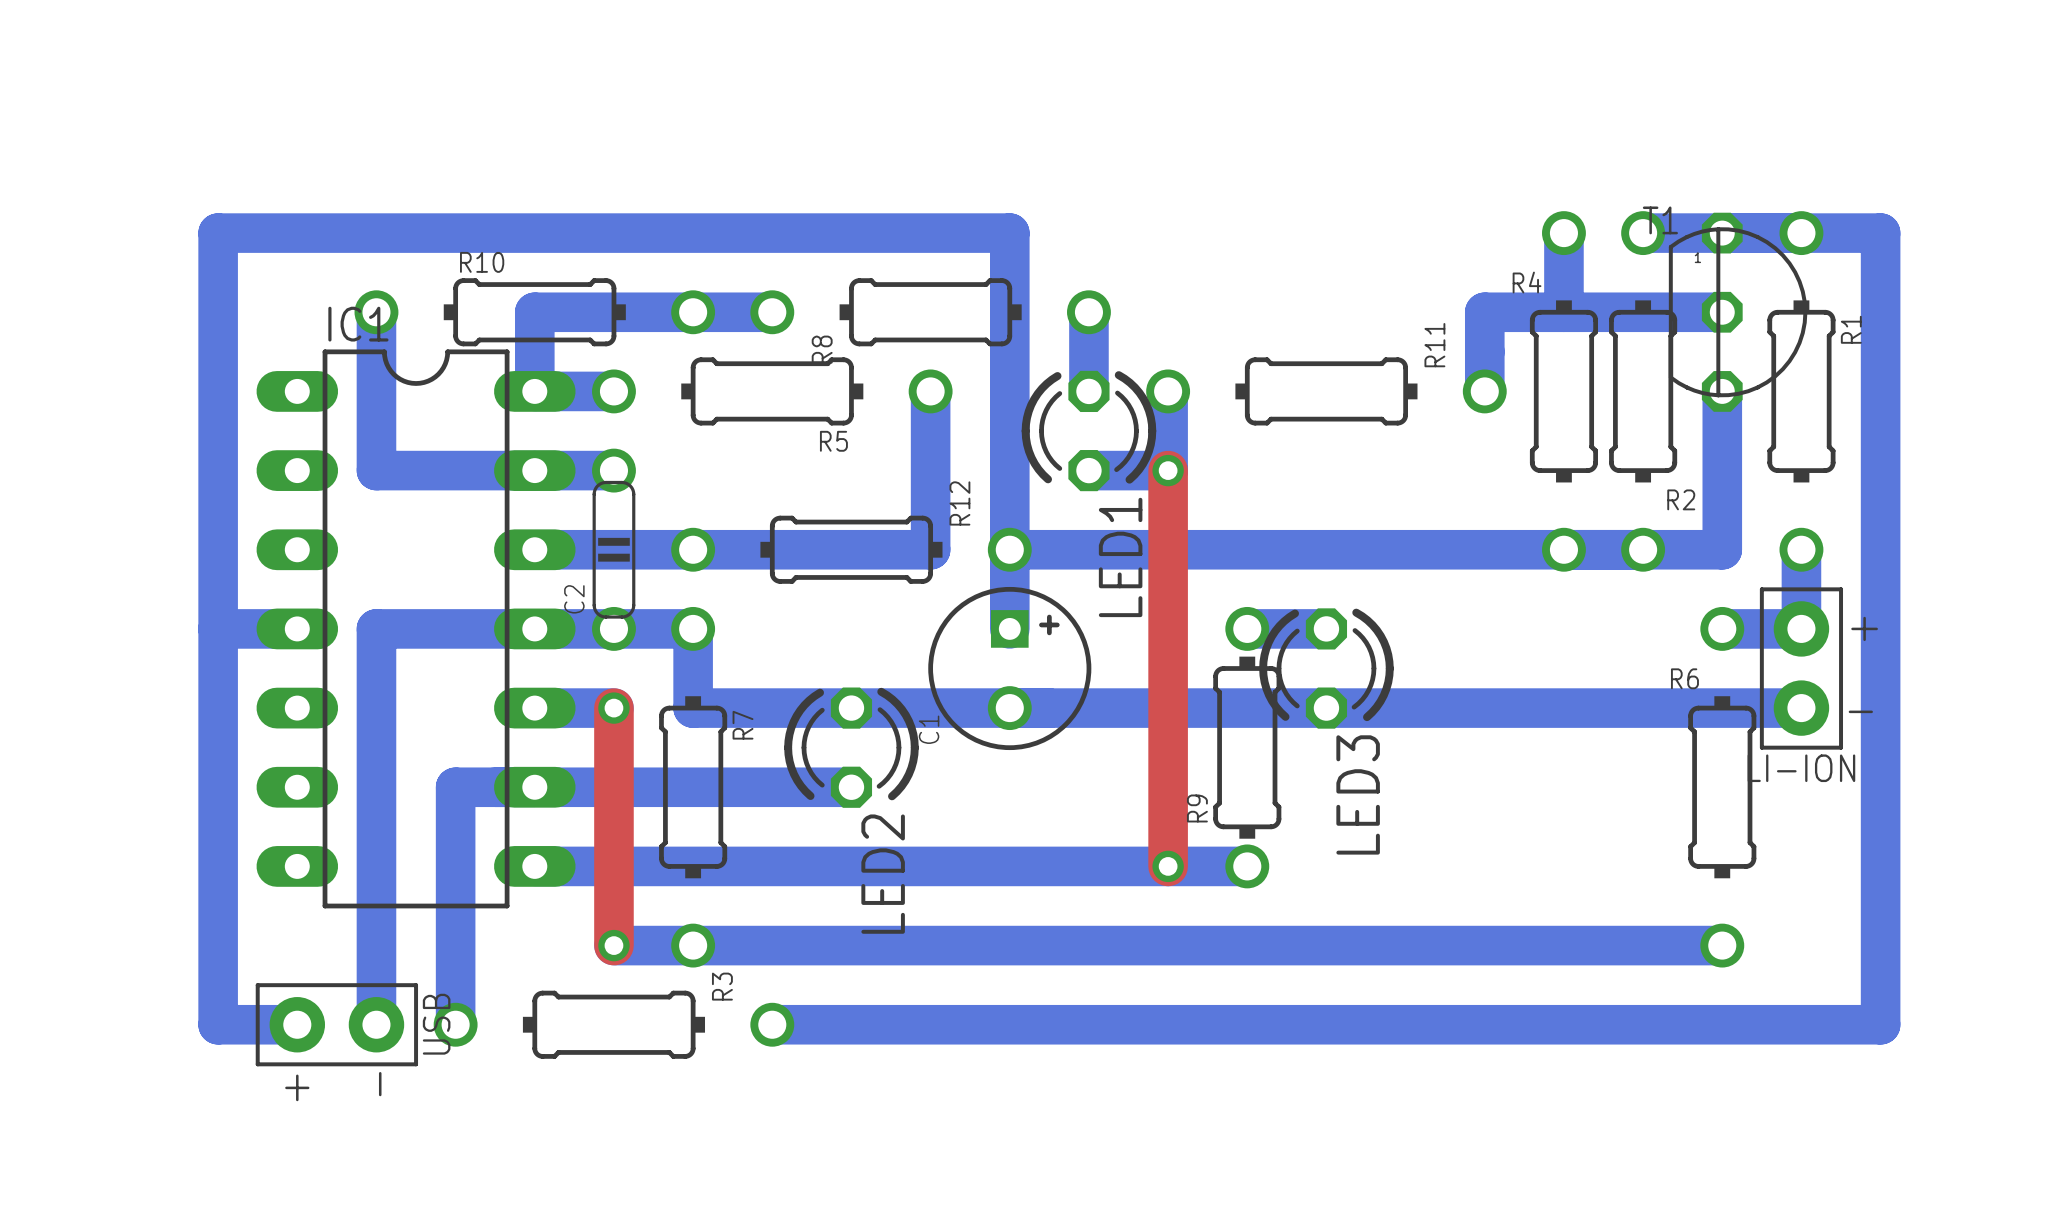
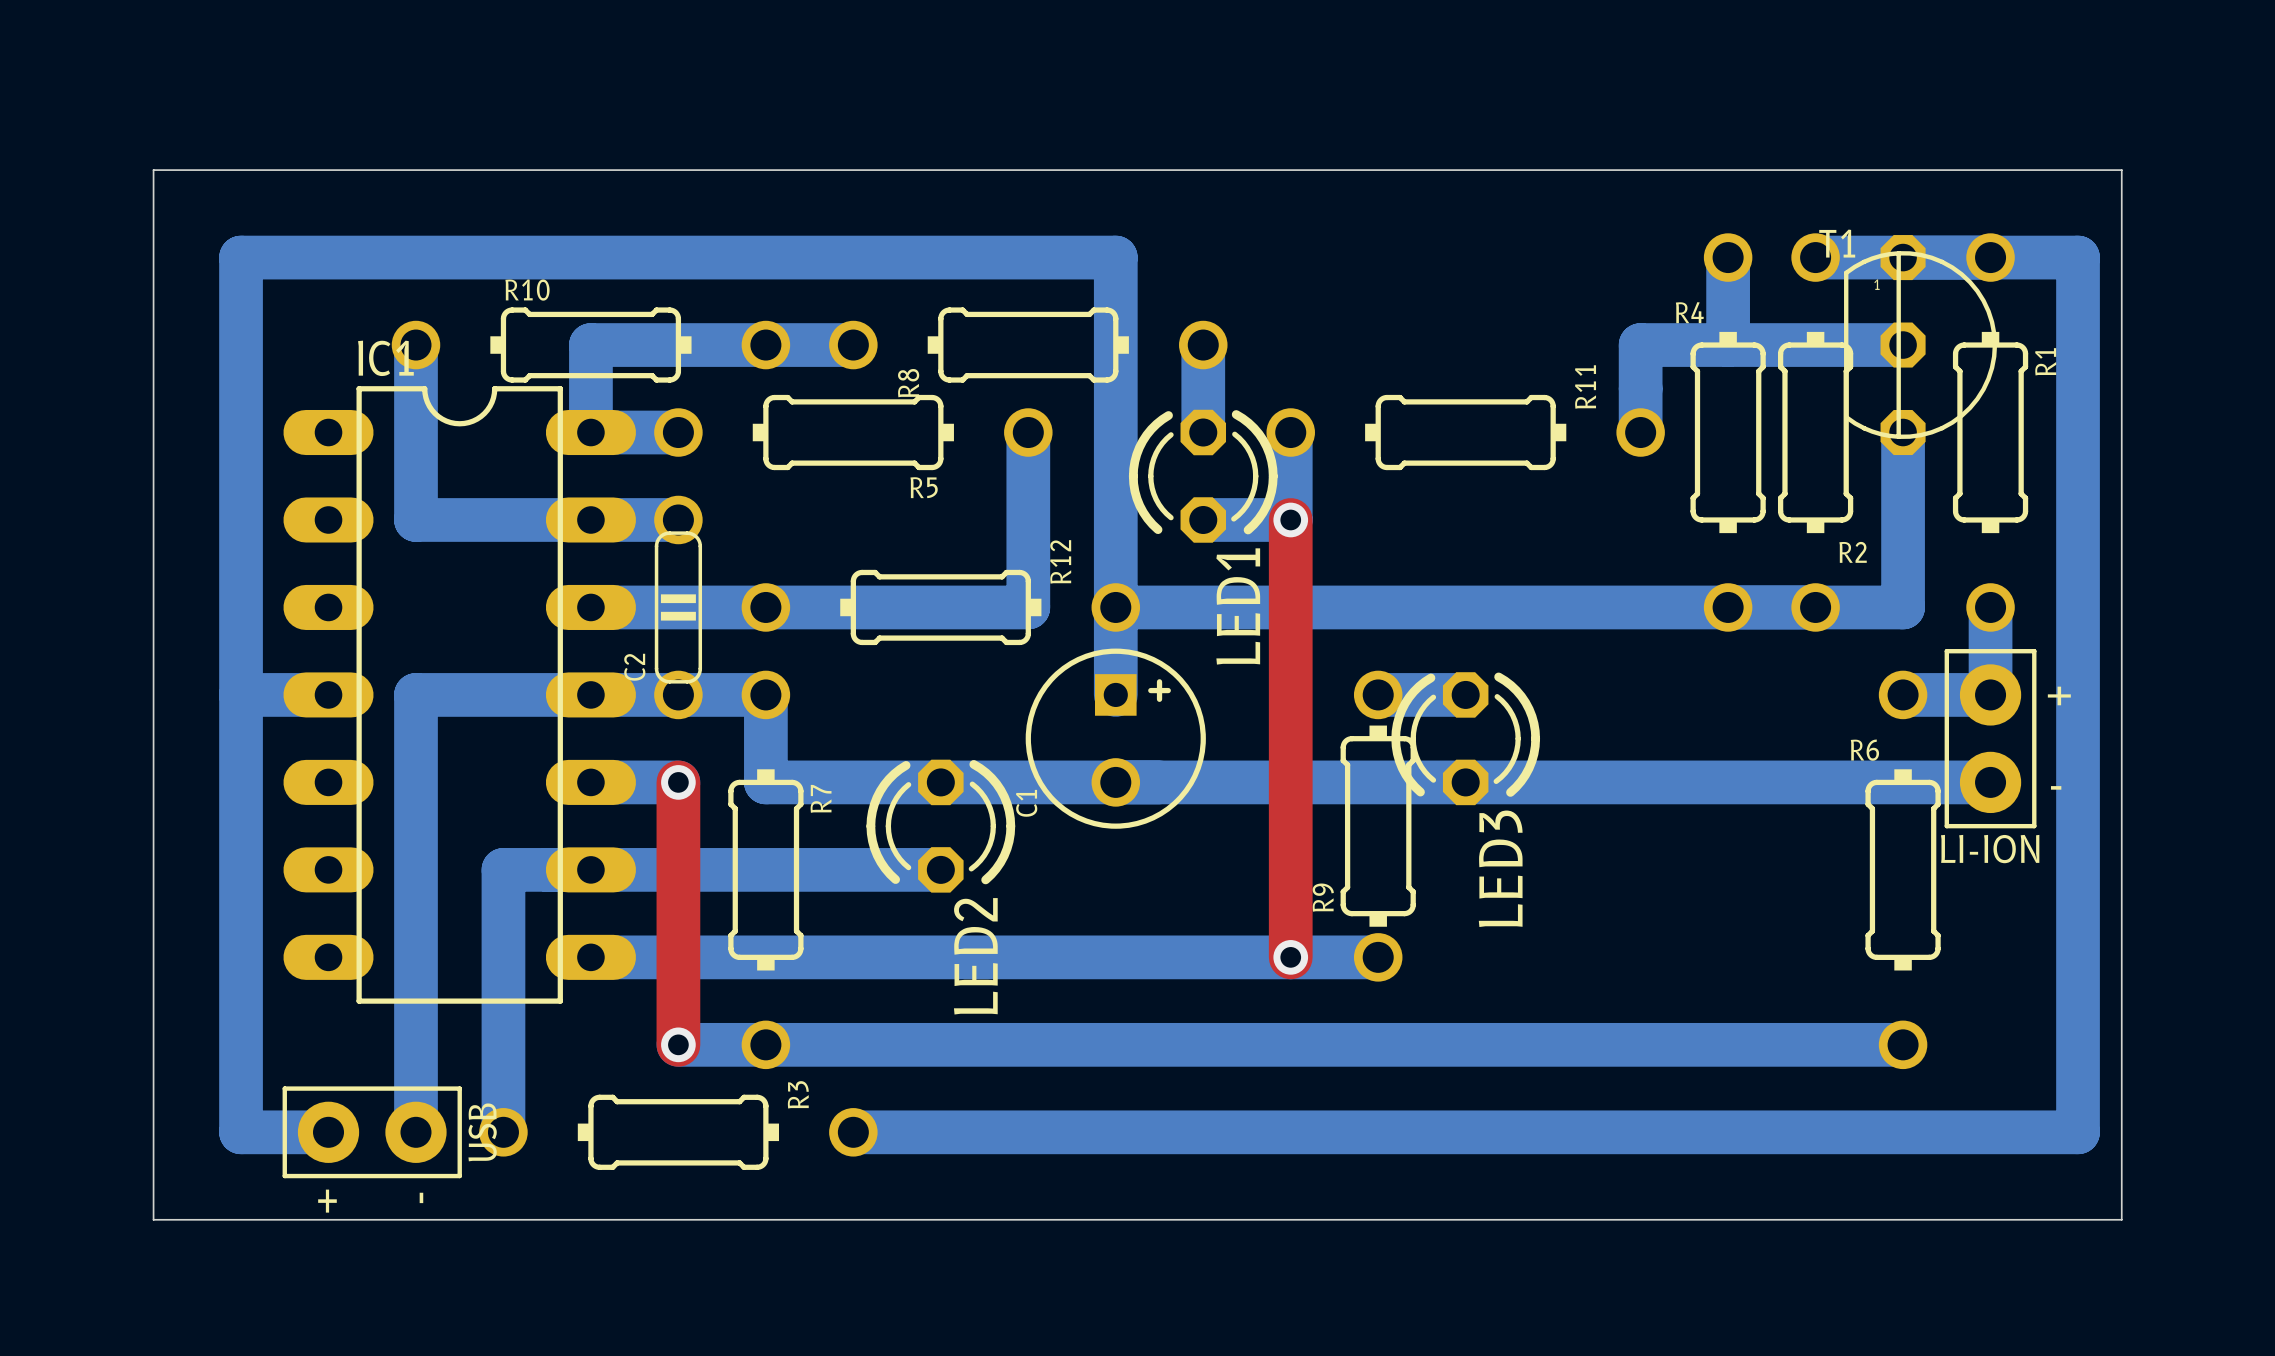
board edge: none -> (153, 170) (2121, 170) (2121, 1219) (153, 1219) (153, 170)

